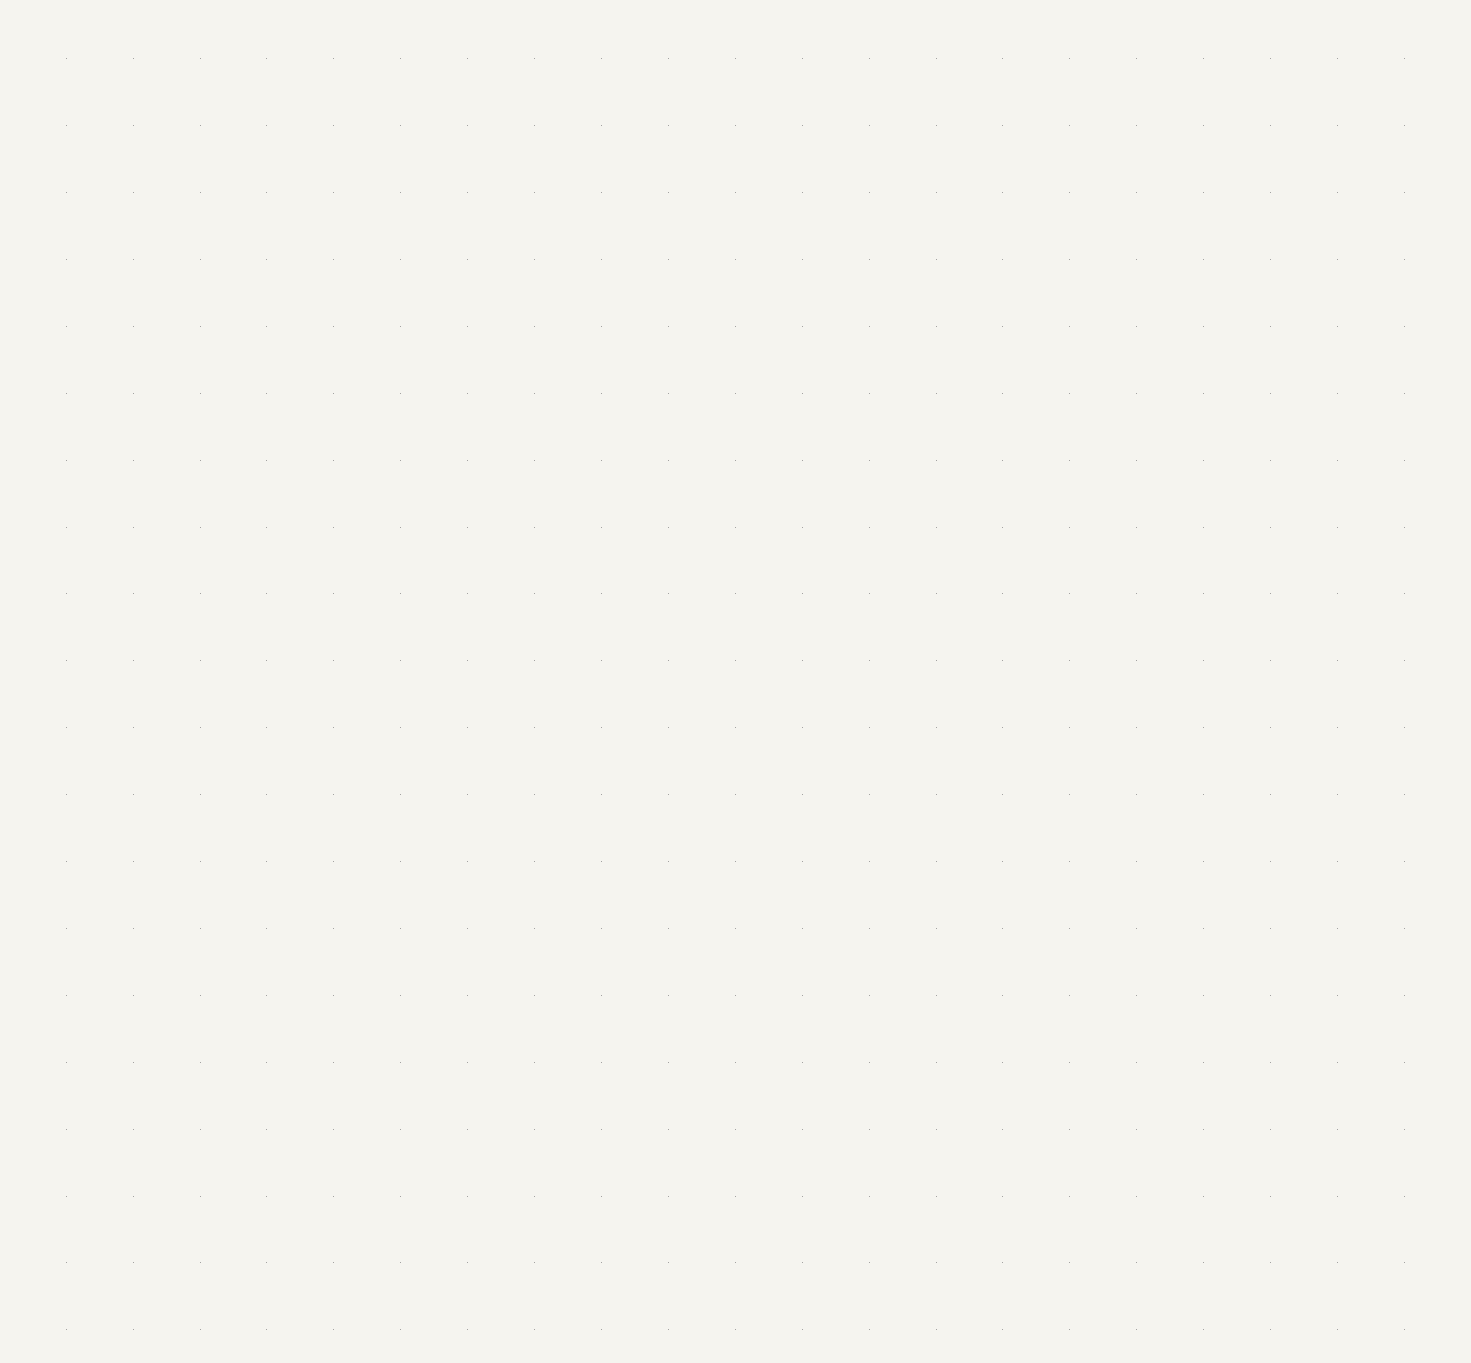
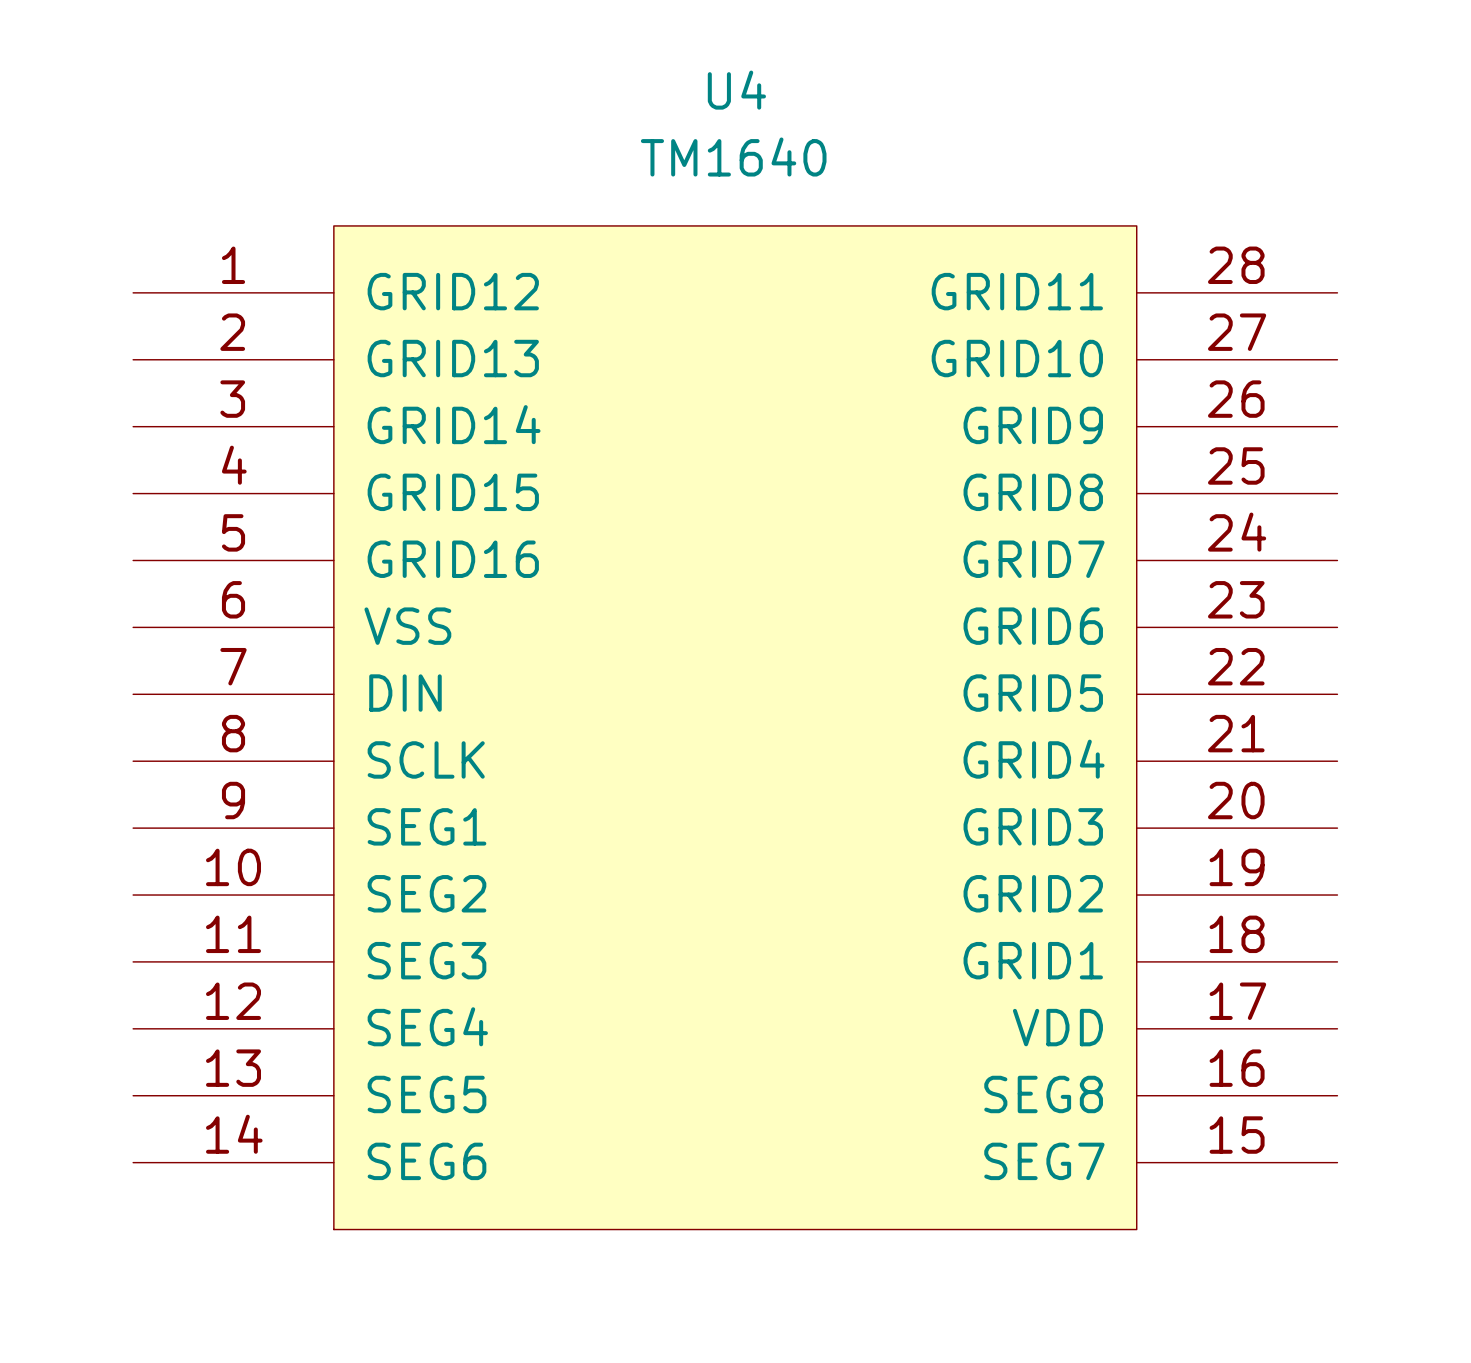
U4: none -> (735, 727)

